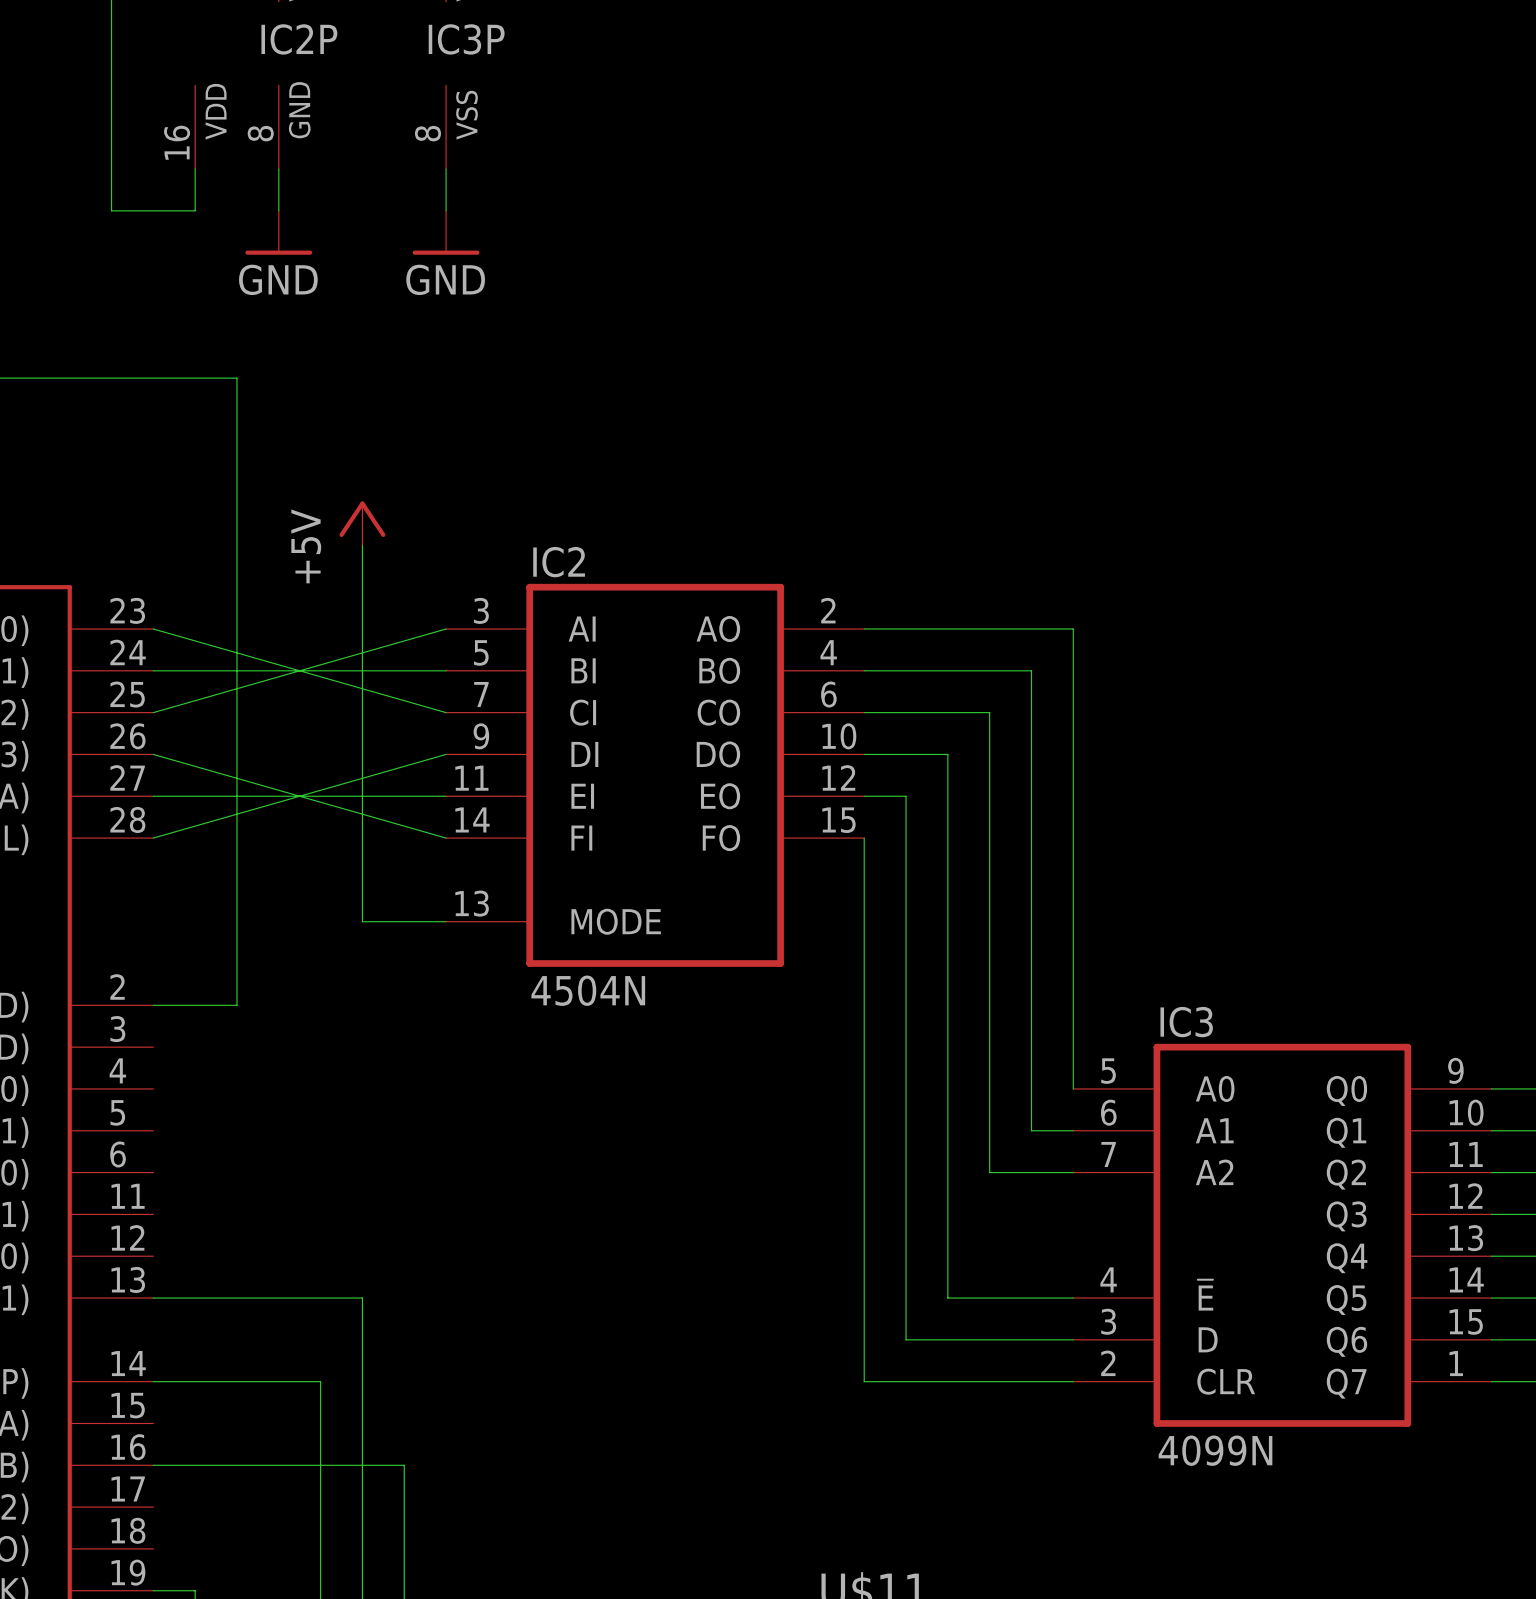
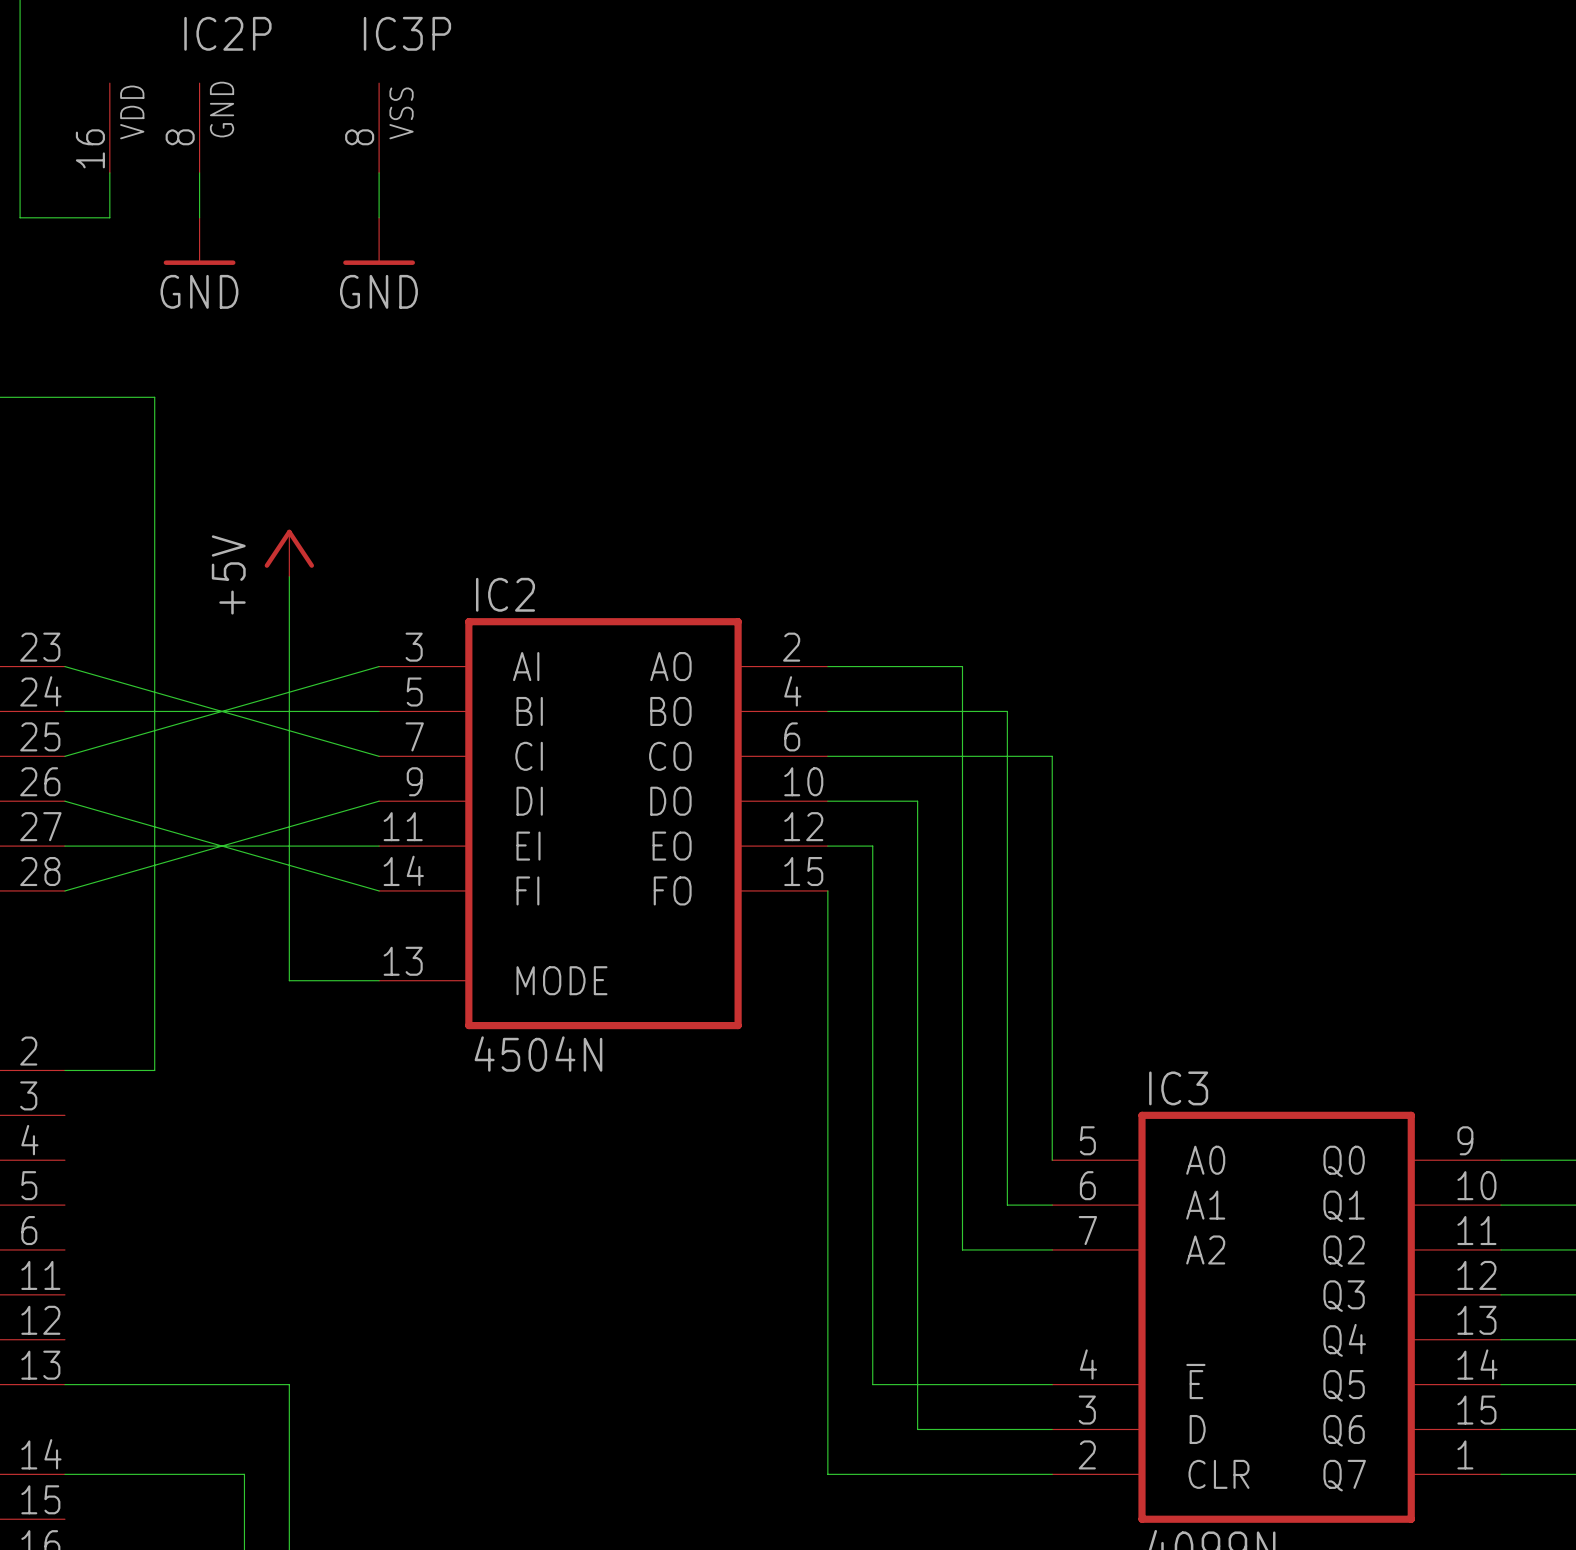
wire: (989, 629) (1073, 629) (1073, 712) -> (962, 666) (962, 756) (1052, 756)
wire: (906, 1298) (906, 1339) (947, 1339) -> (872, 1384) (917, 1384) (917, 1429)

